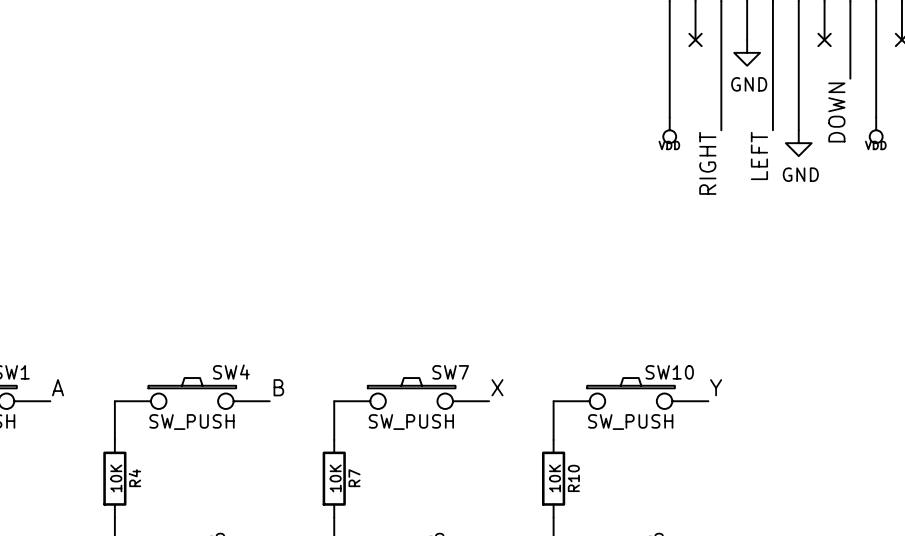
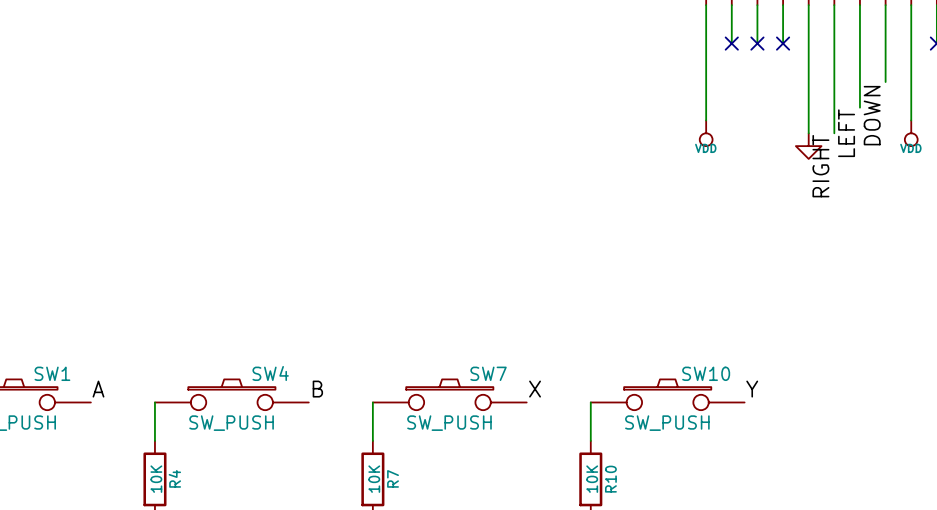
wire: (721, 39) (721, 130) -> none
no-connect mark: none -> (757, 43)
no-connect mark: none -> (783, 43)
wire: none -> (859, 43) (859, 107)
no-connect mark: (824, 39) -> none
power symbol: GND (747, 52) -> none
power symbol: none -> (808, 146)
power symbol: GND (798, 143) -> none
label position: LEFT (759, 155) -> LEFT (846, 133)
label position: RIGHT (707, 163) -> RIGHT (820, 166)

